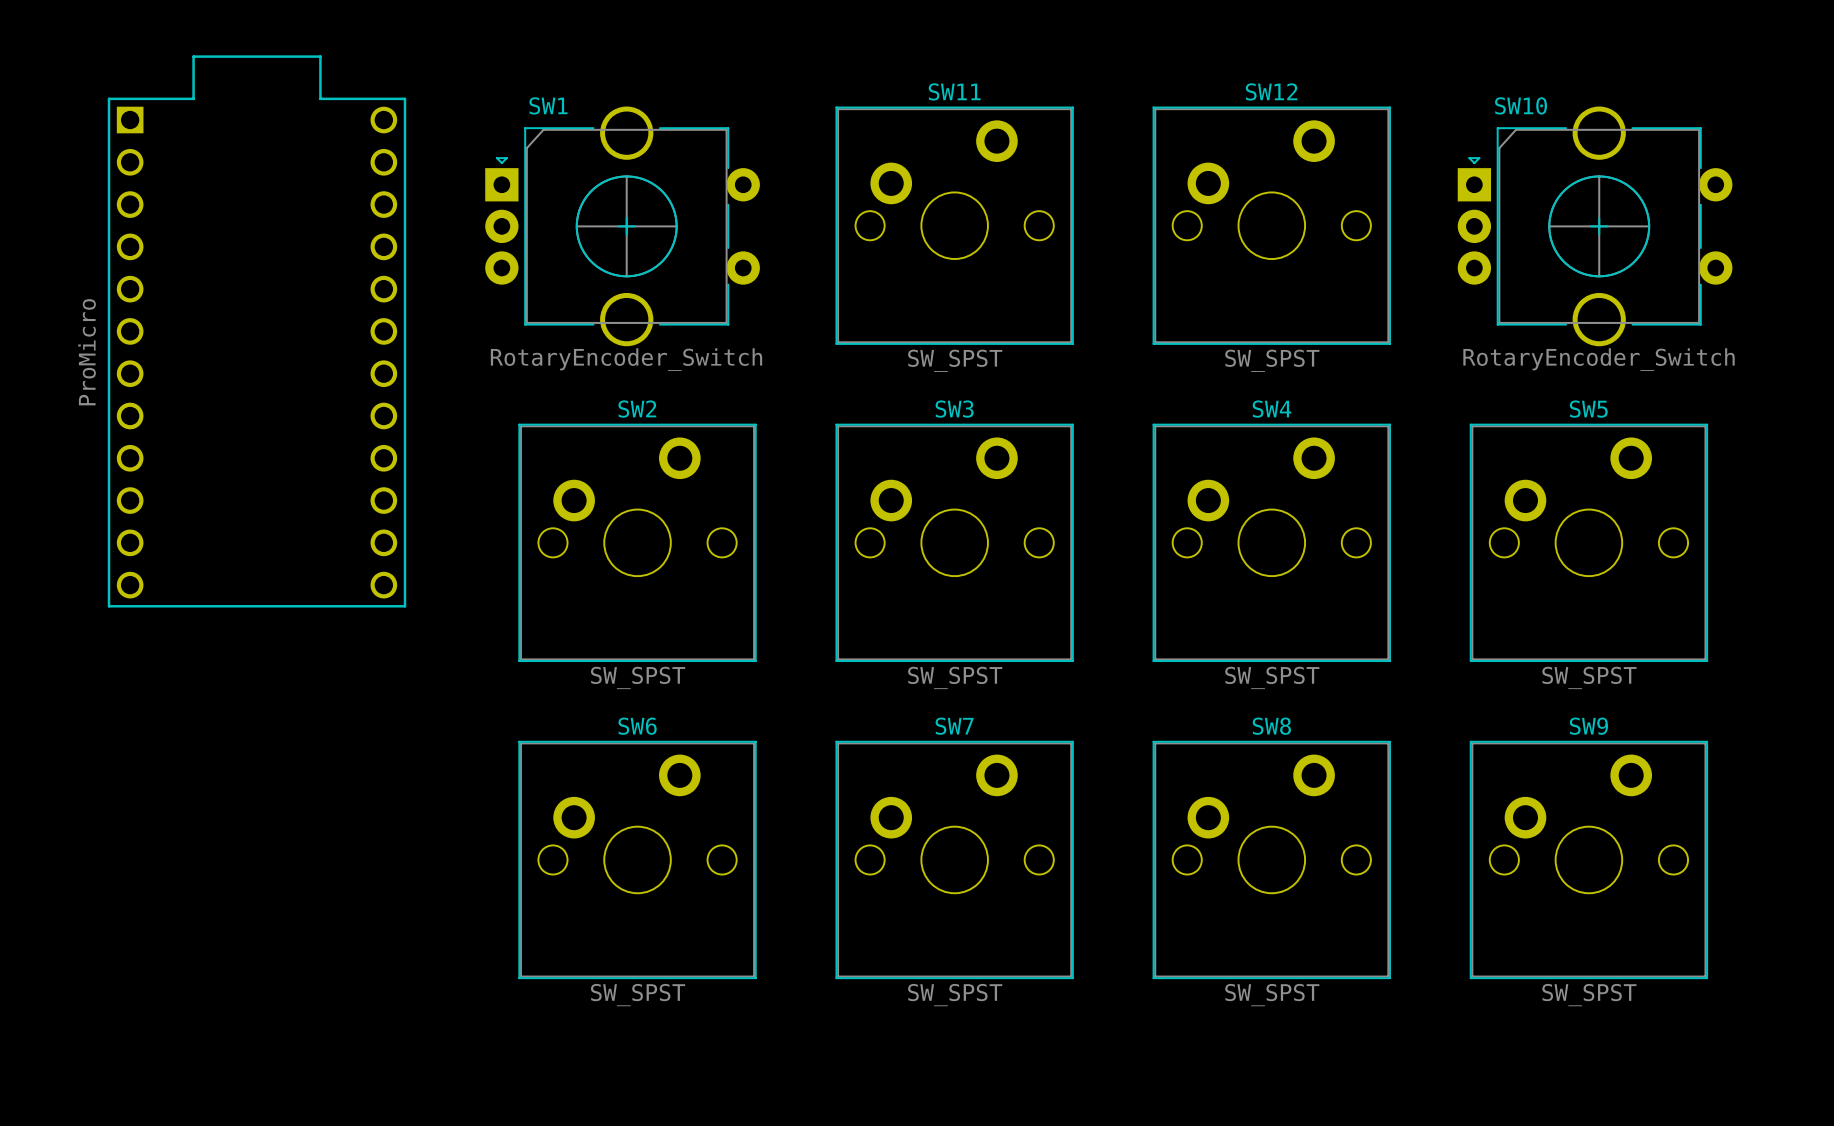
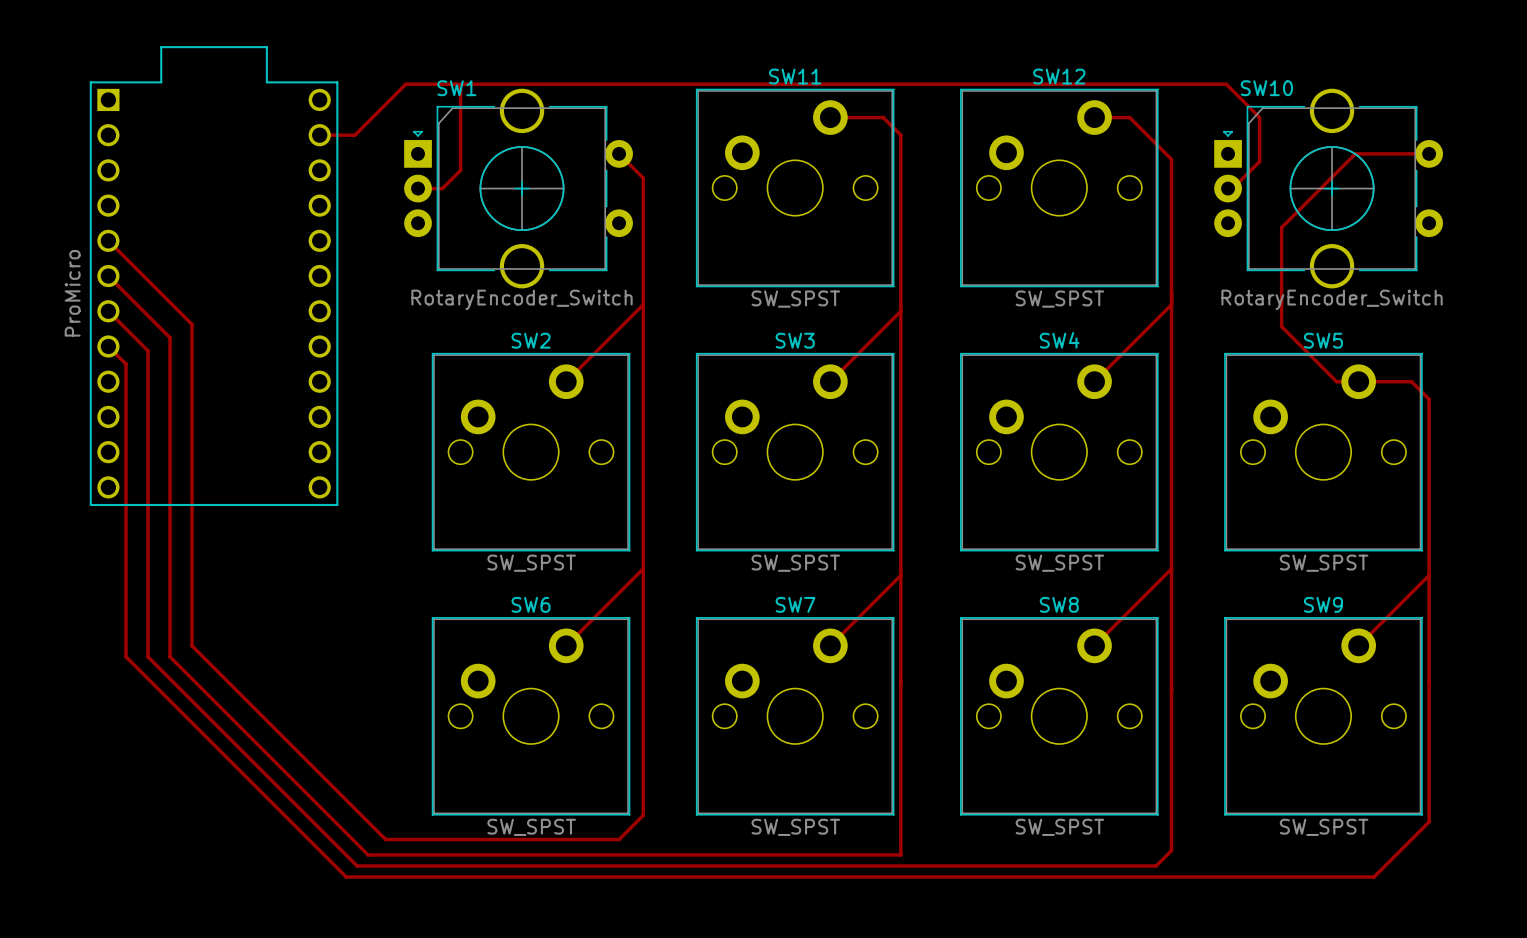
track: none -> (456, 84) (460, 88) (460, 170) (442, 188) (418, 188)
track: none -> (830, 117) (883, 117) (900, 135) (900, 854) (368, 854) (170, 656) (170, 337) (108, 276)
track: none -> (1094, 117) (1129, 117) (1171, 159) (1171, 850) (1156, 865) (357, 865) (148, 656) (148, 350) (108, 311)
track: none -> (319, 135) (354, 135) (405, 84) (1226, 84) (1259, 117) (1259, 161) (1232, 188) (1228, 188)
track: none -> (619, 153) (643, 178) (643, 815) (619, 839) (385, 839) (192, 645) (192, 324) (108, 240)
track: none -> (1429, 153) (1355, 153) (1281, 227) (1281, 326) (1336, 381) (1411, 381) (1429, 399) (1429, 821) (1374, 876) (346, 876) (126, 656) (126, 364) (108, 346)
track: none -> (643, 304) (566, 381)
track: none -> (1171, 304) (1094, 381)
track: none -> (900, 311) (830, 381)
track: none -> (643, 568) (566, 645)
track: none -> (1171, 568) (1094, 645)
track: none -> (900, 575) (830, 645)
track: none -> (1429, 575) (1358, 645)

